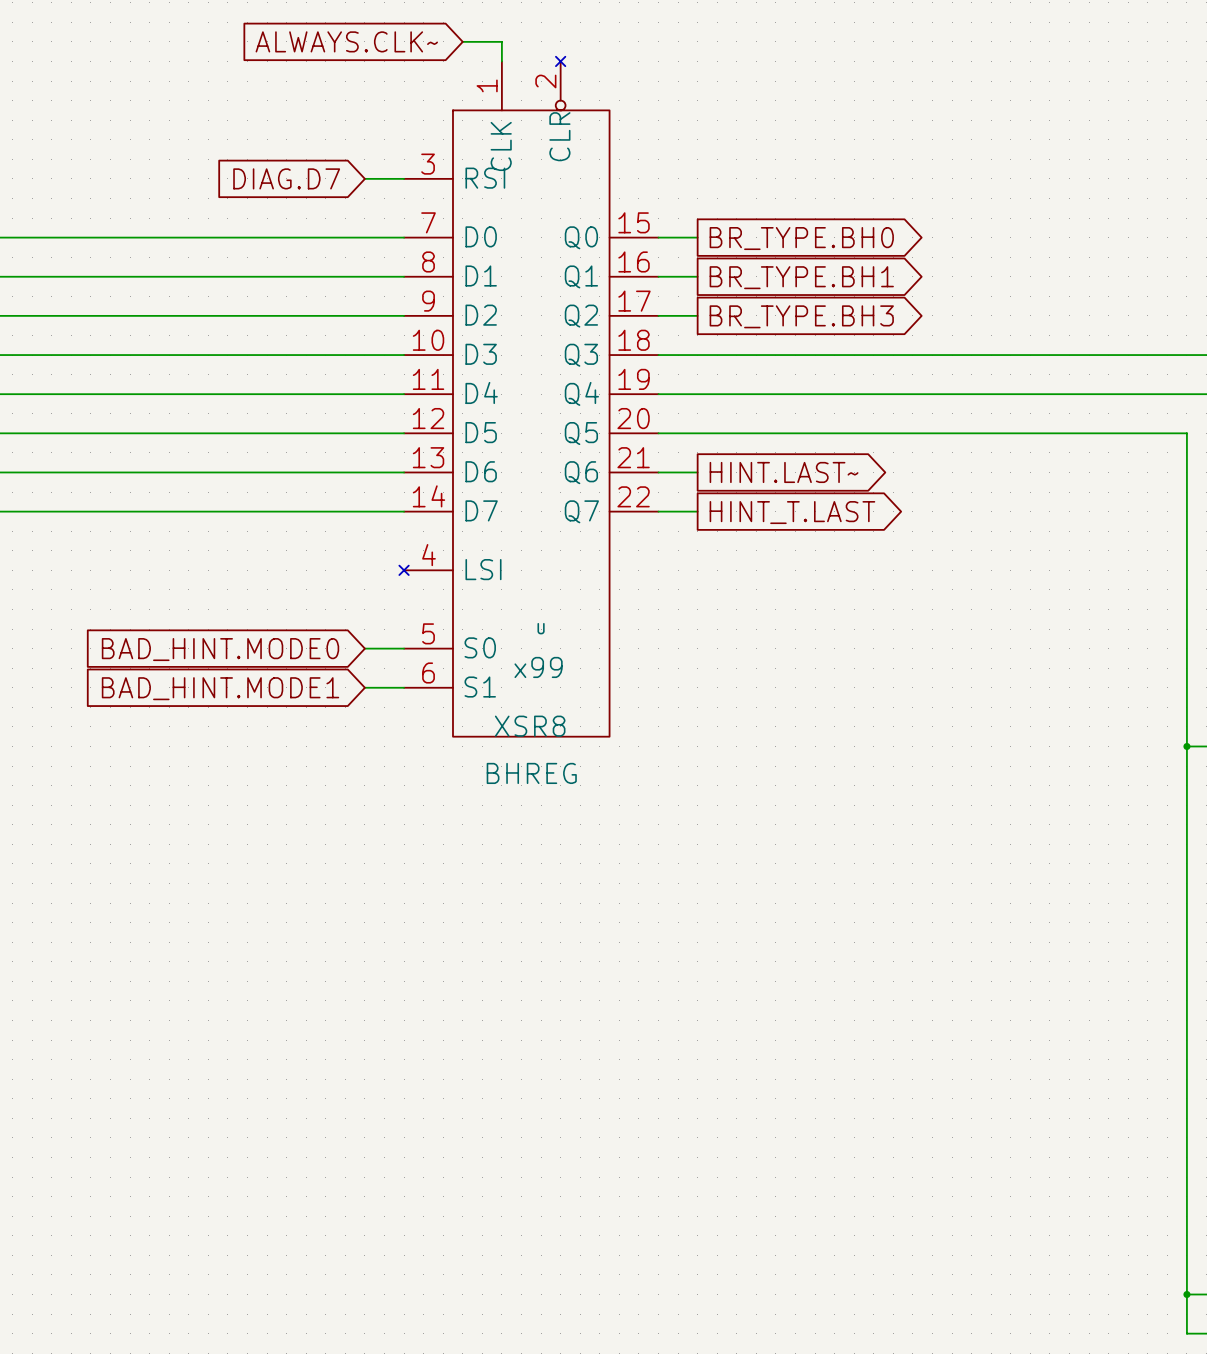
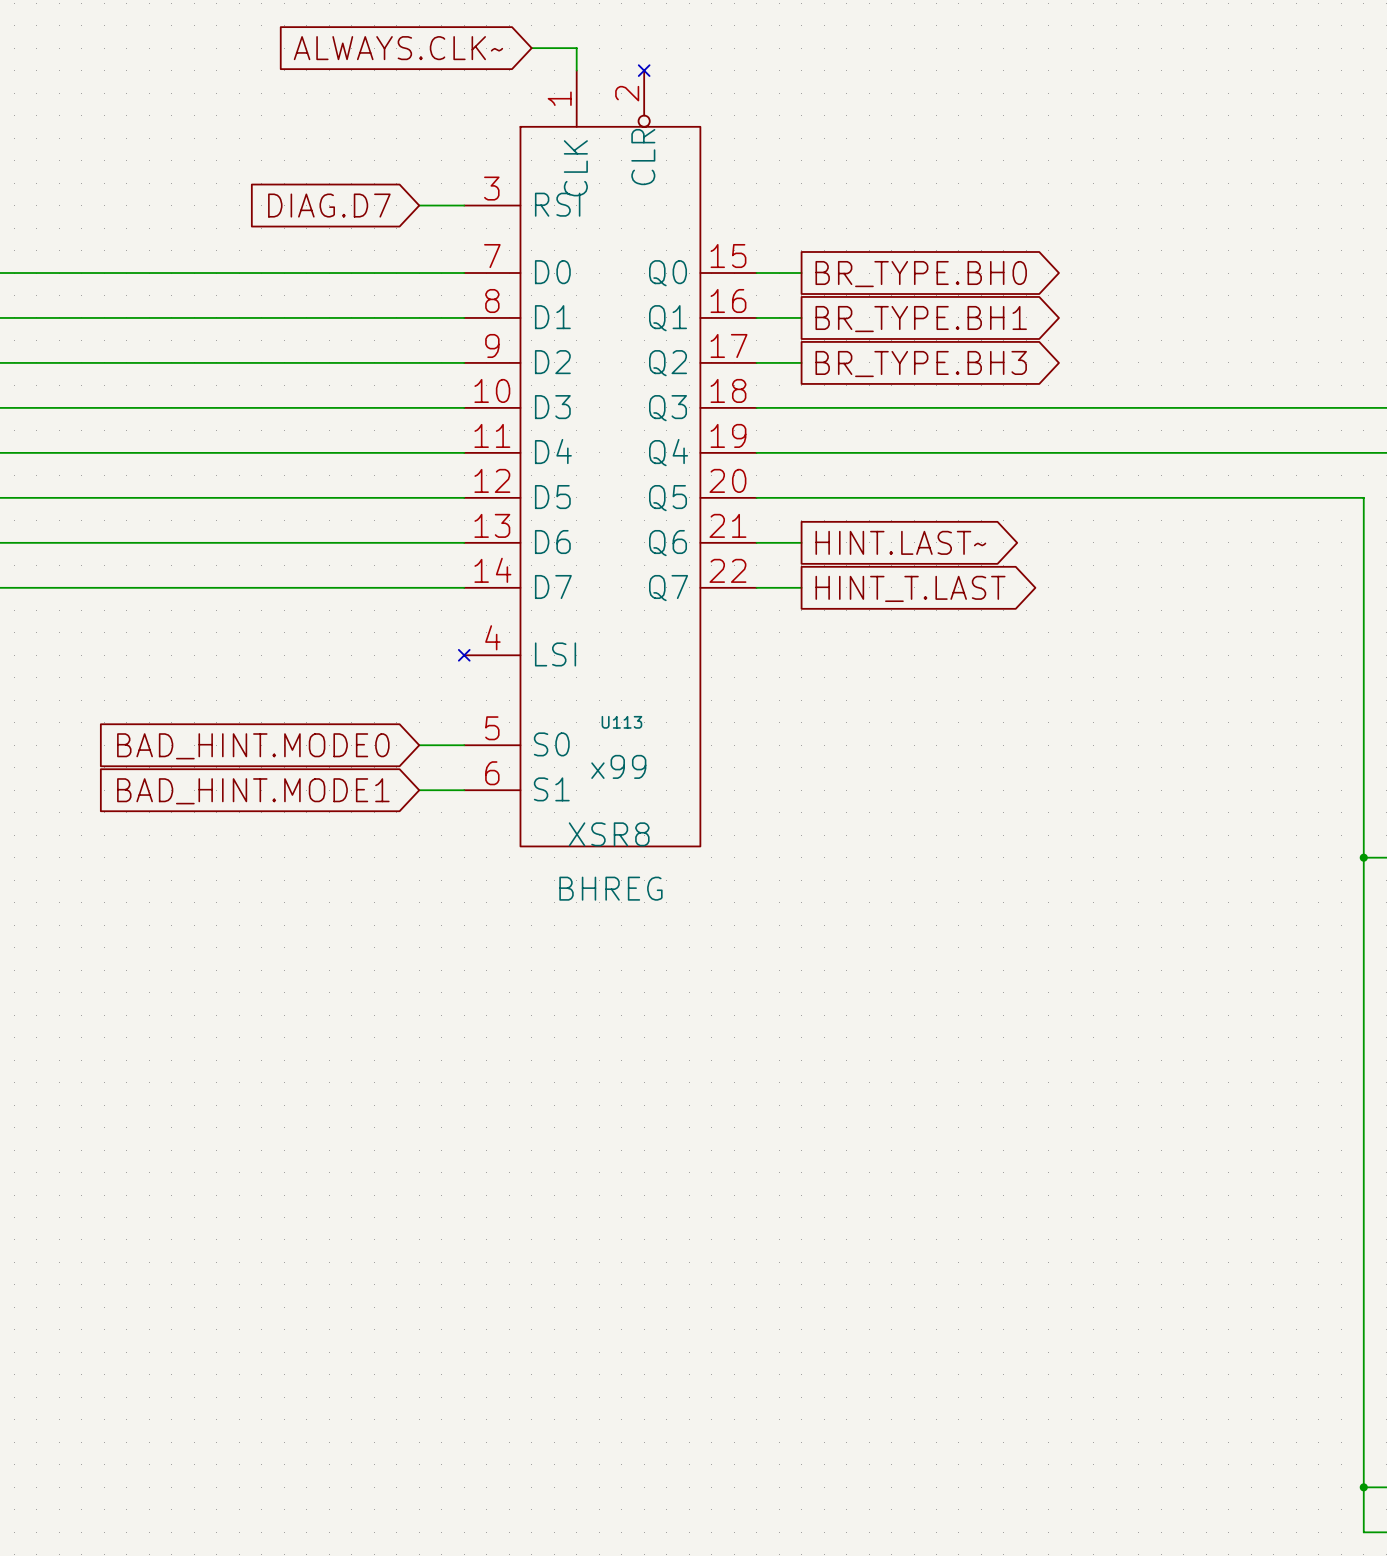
U name: U (541, 628) -> U113 (621, 722)

